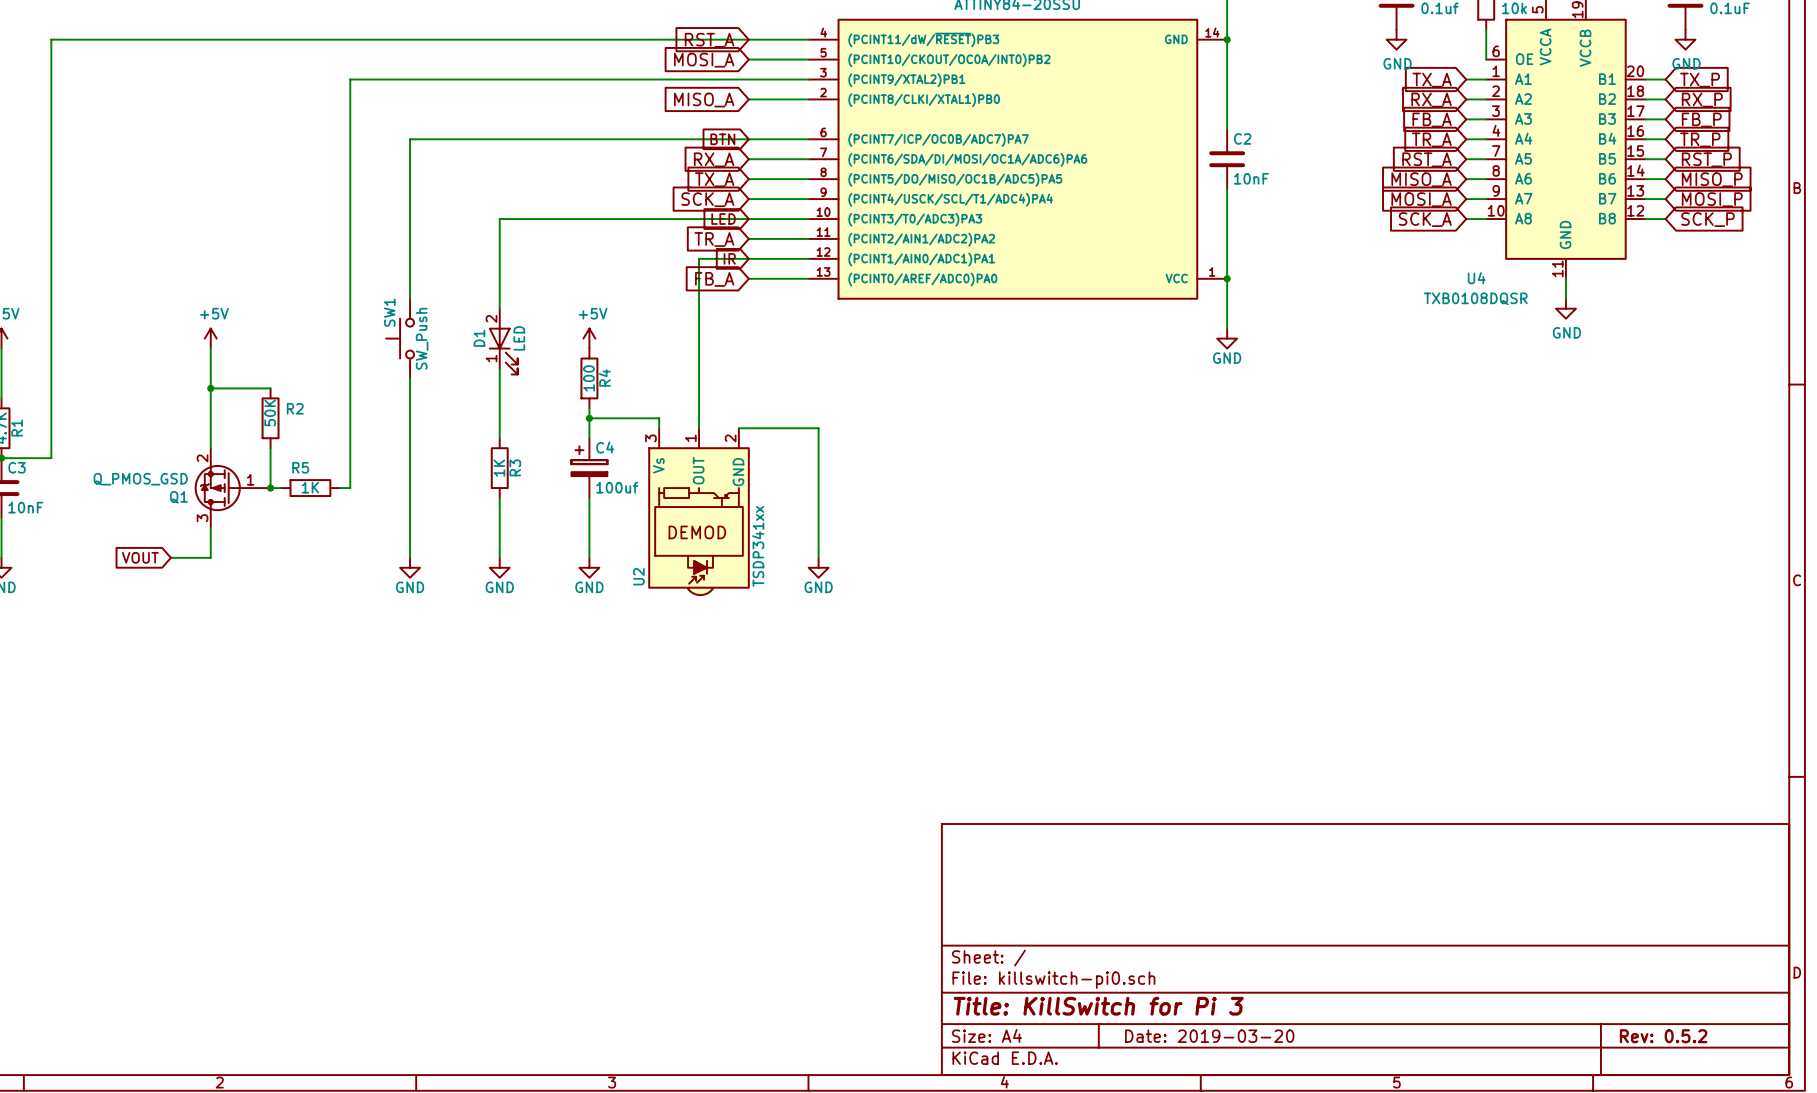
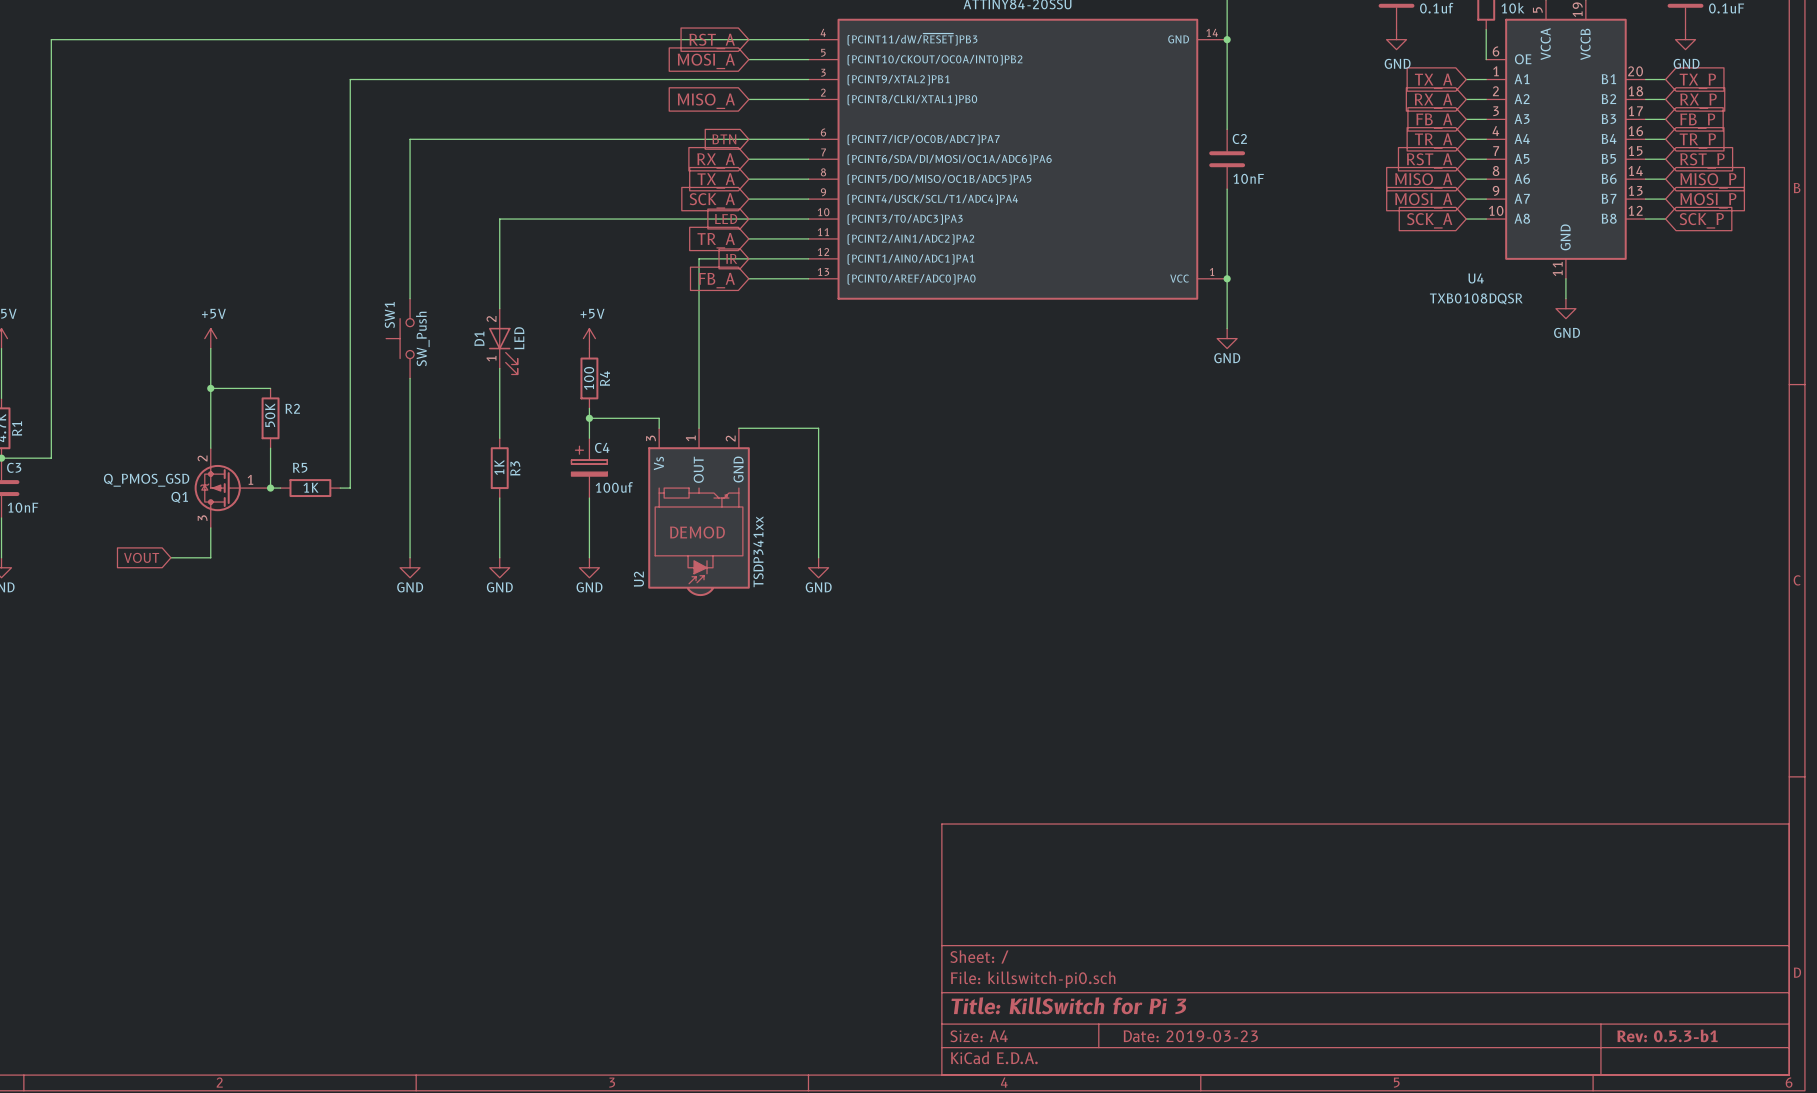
title block: Date: 2019-03-20 (1209, 1036) -> Date: 2019-03-23 (1190, 1036)
title block: Rev: 0.5.2 (1663, 1036) -> Rev: 0.5.3-b1 (1667, 1035)

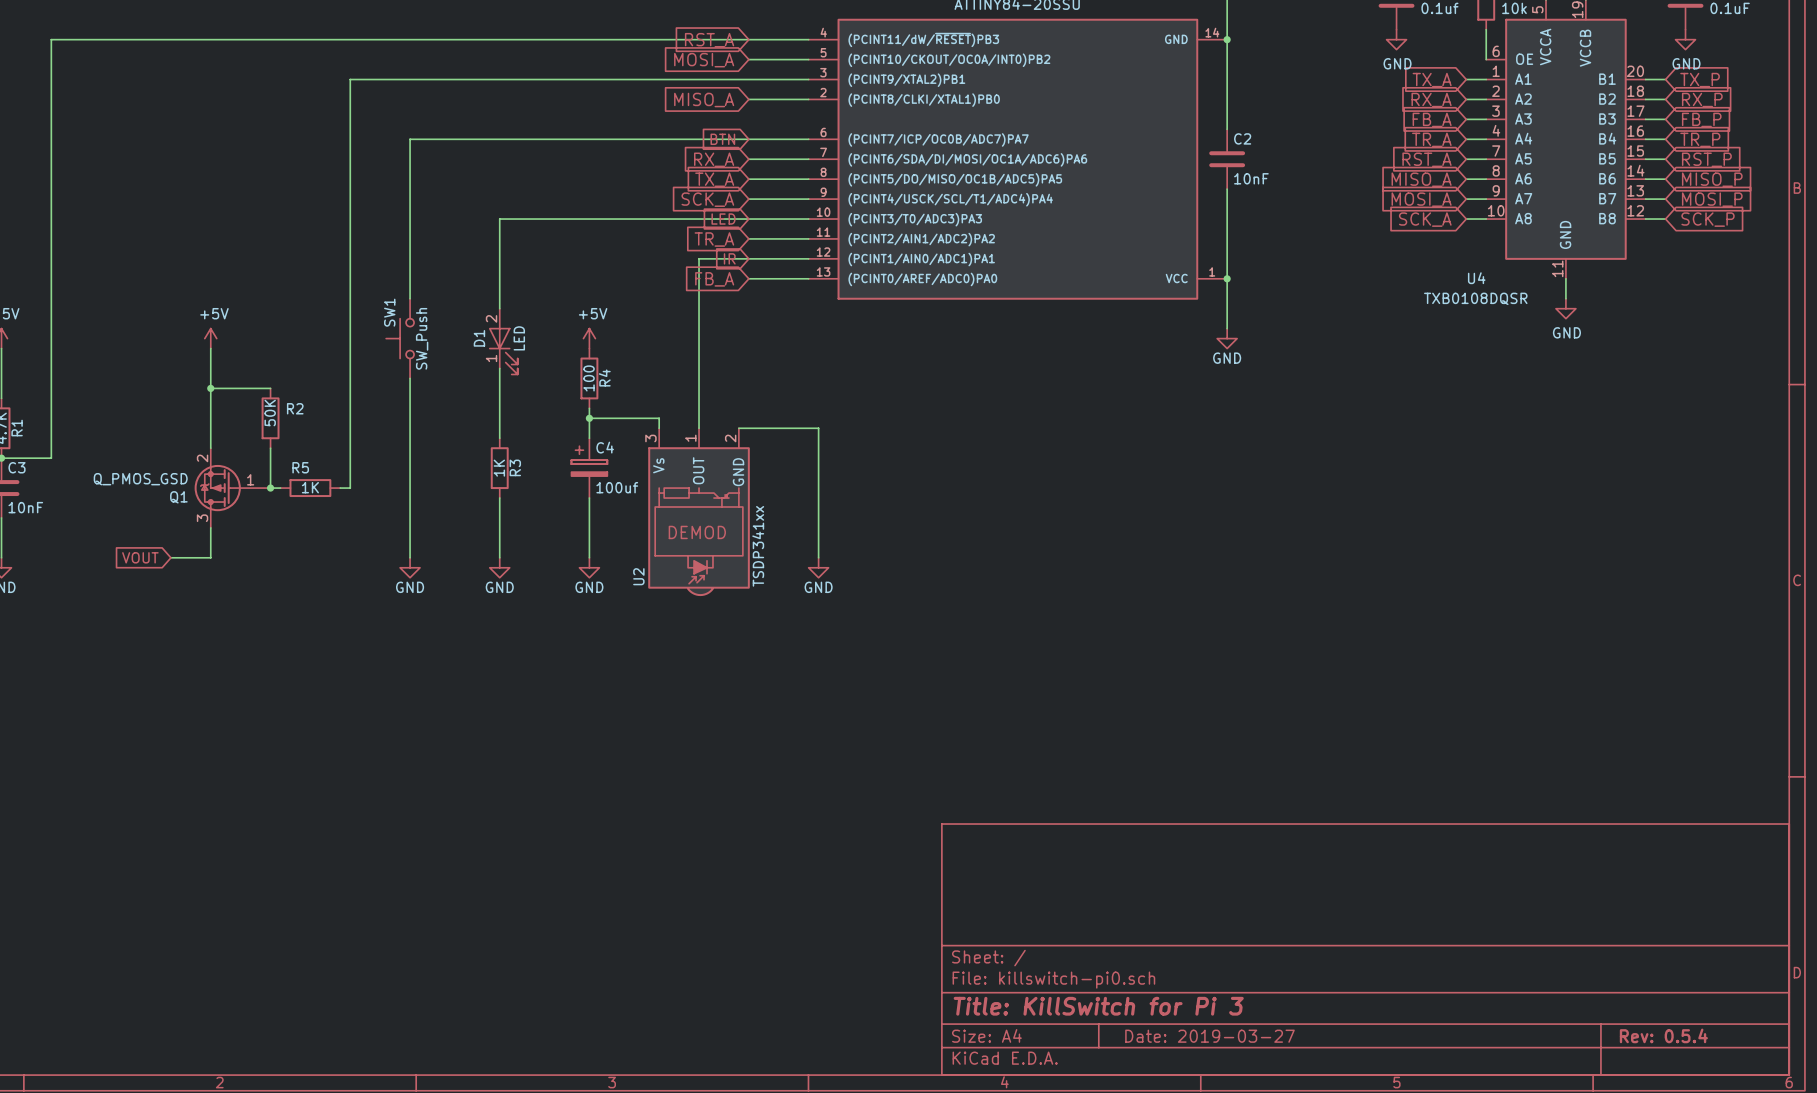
title block: Rev: 0.5.3-b1 (1667, 1035) -> Rev: 0.5.4 (1663, 1035)
title block: Date: 2019-03-23 (1190, 1036) -> Date: 2019-03-27 (1209, 1036)

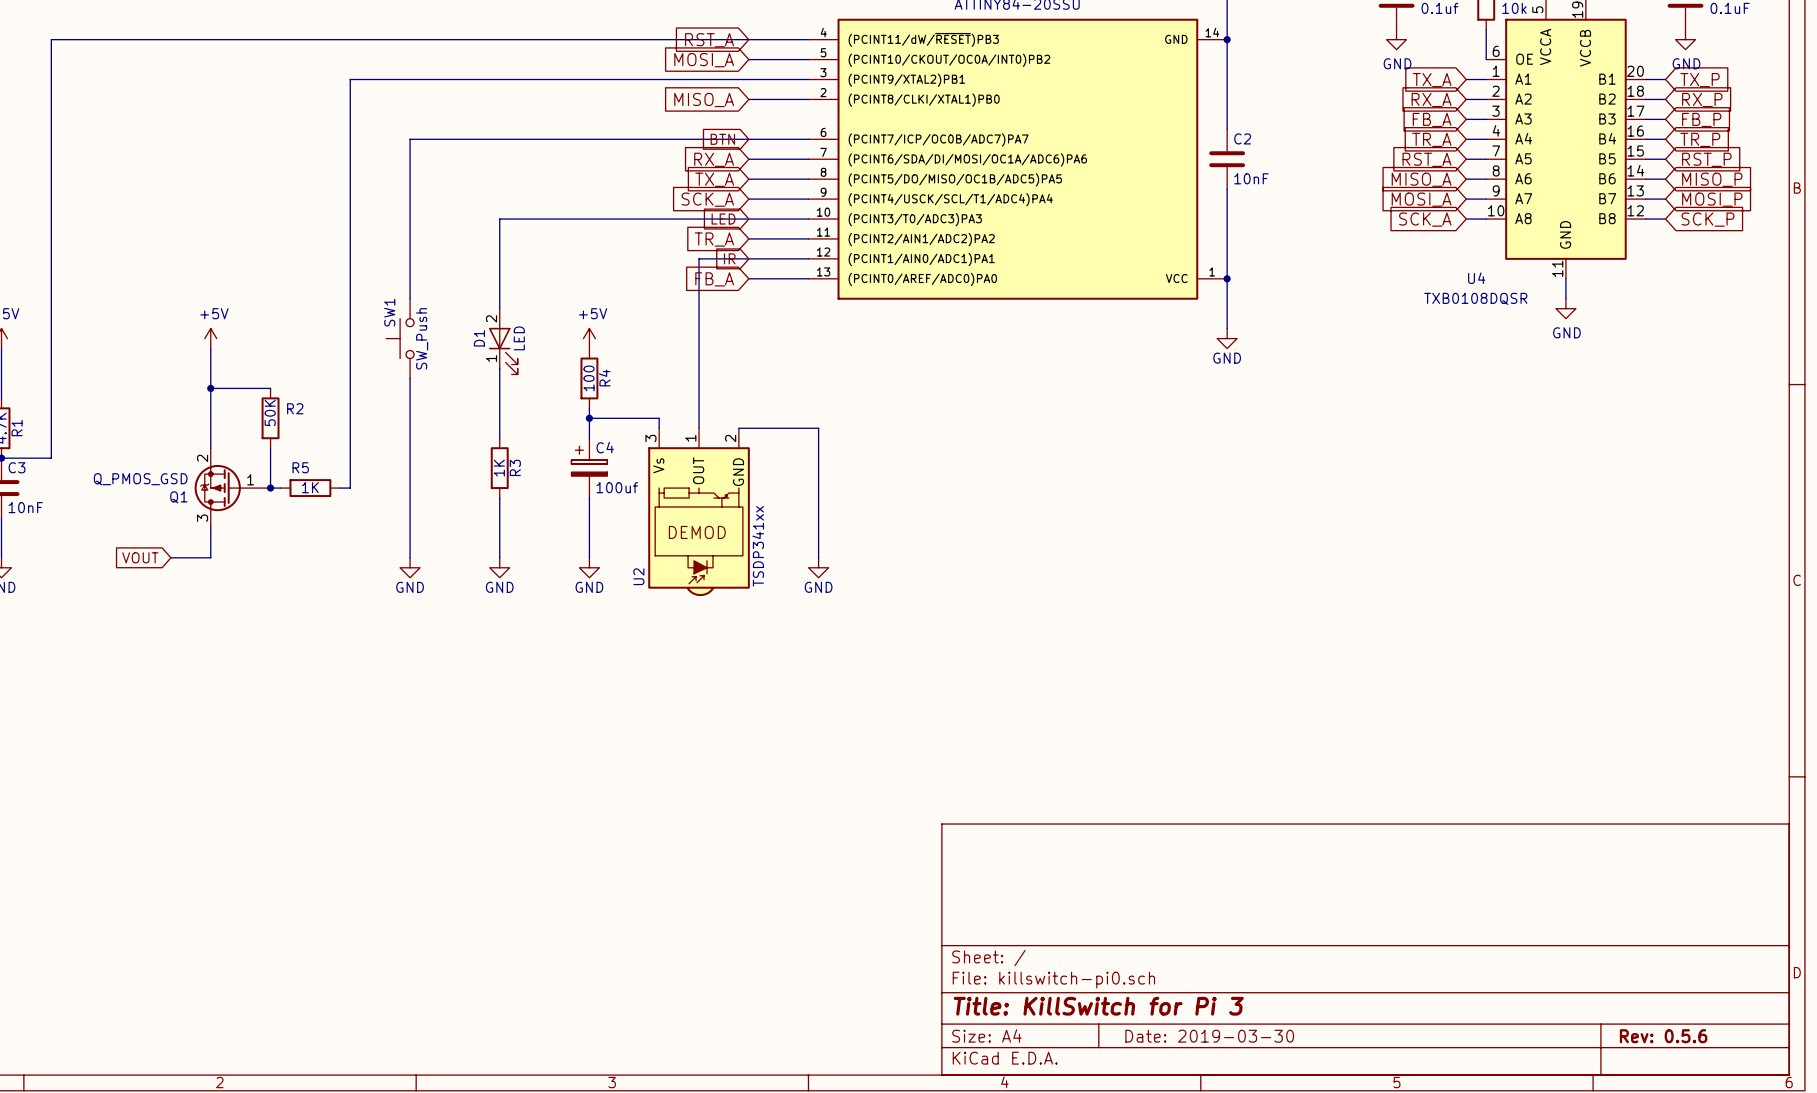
title block: Rev: 0.5.4 (1663, 1035) -> Rev: 0.5.6 (1663, 1036)
title block: Date: 2019-03-27 (1209, 1036) -> Date: 2019-03-30 (1209, 1036)

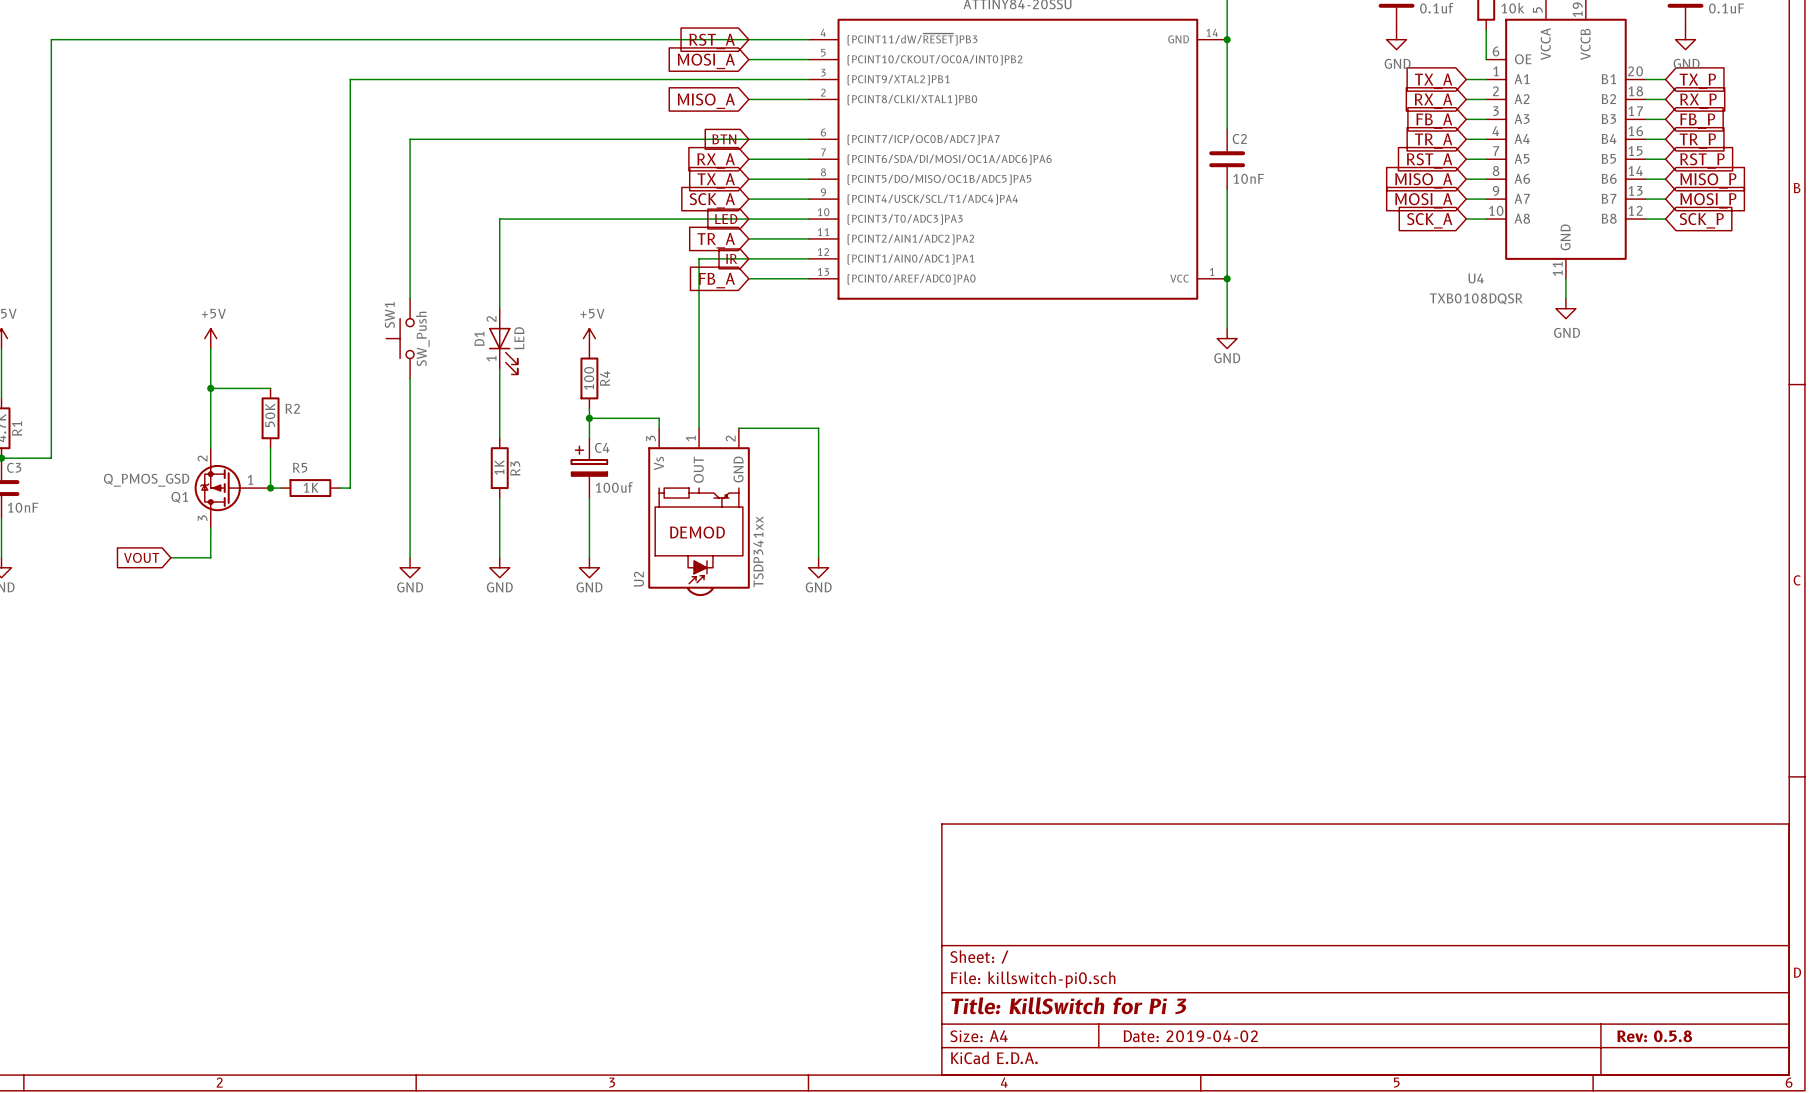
title block: Date: 2019-03-30 (1209, 1036) -> Date: 2019-04-02 (1190, 1036)
title block: Rev: 0.5.6 (1663, 1036) -> Rev: 0.5.8 (1654, 1036)

